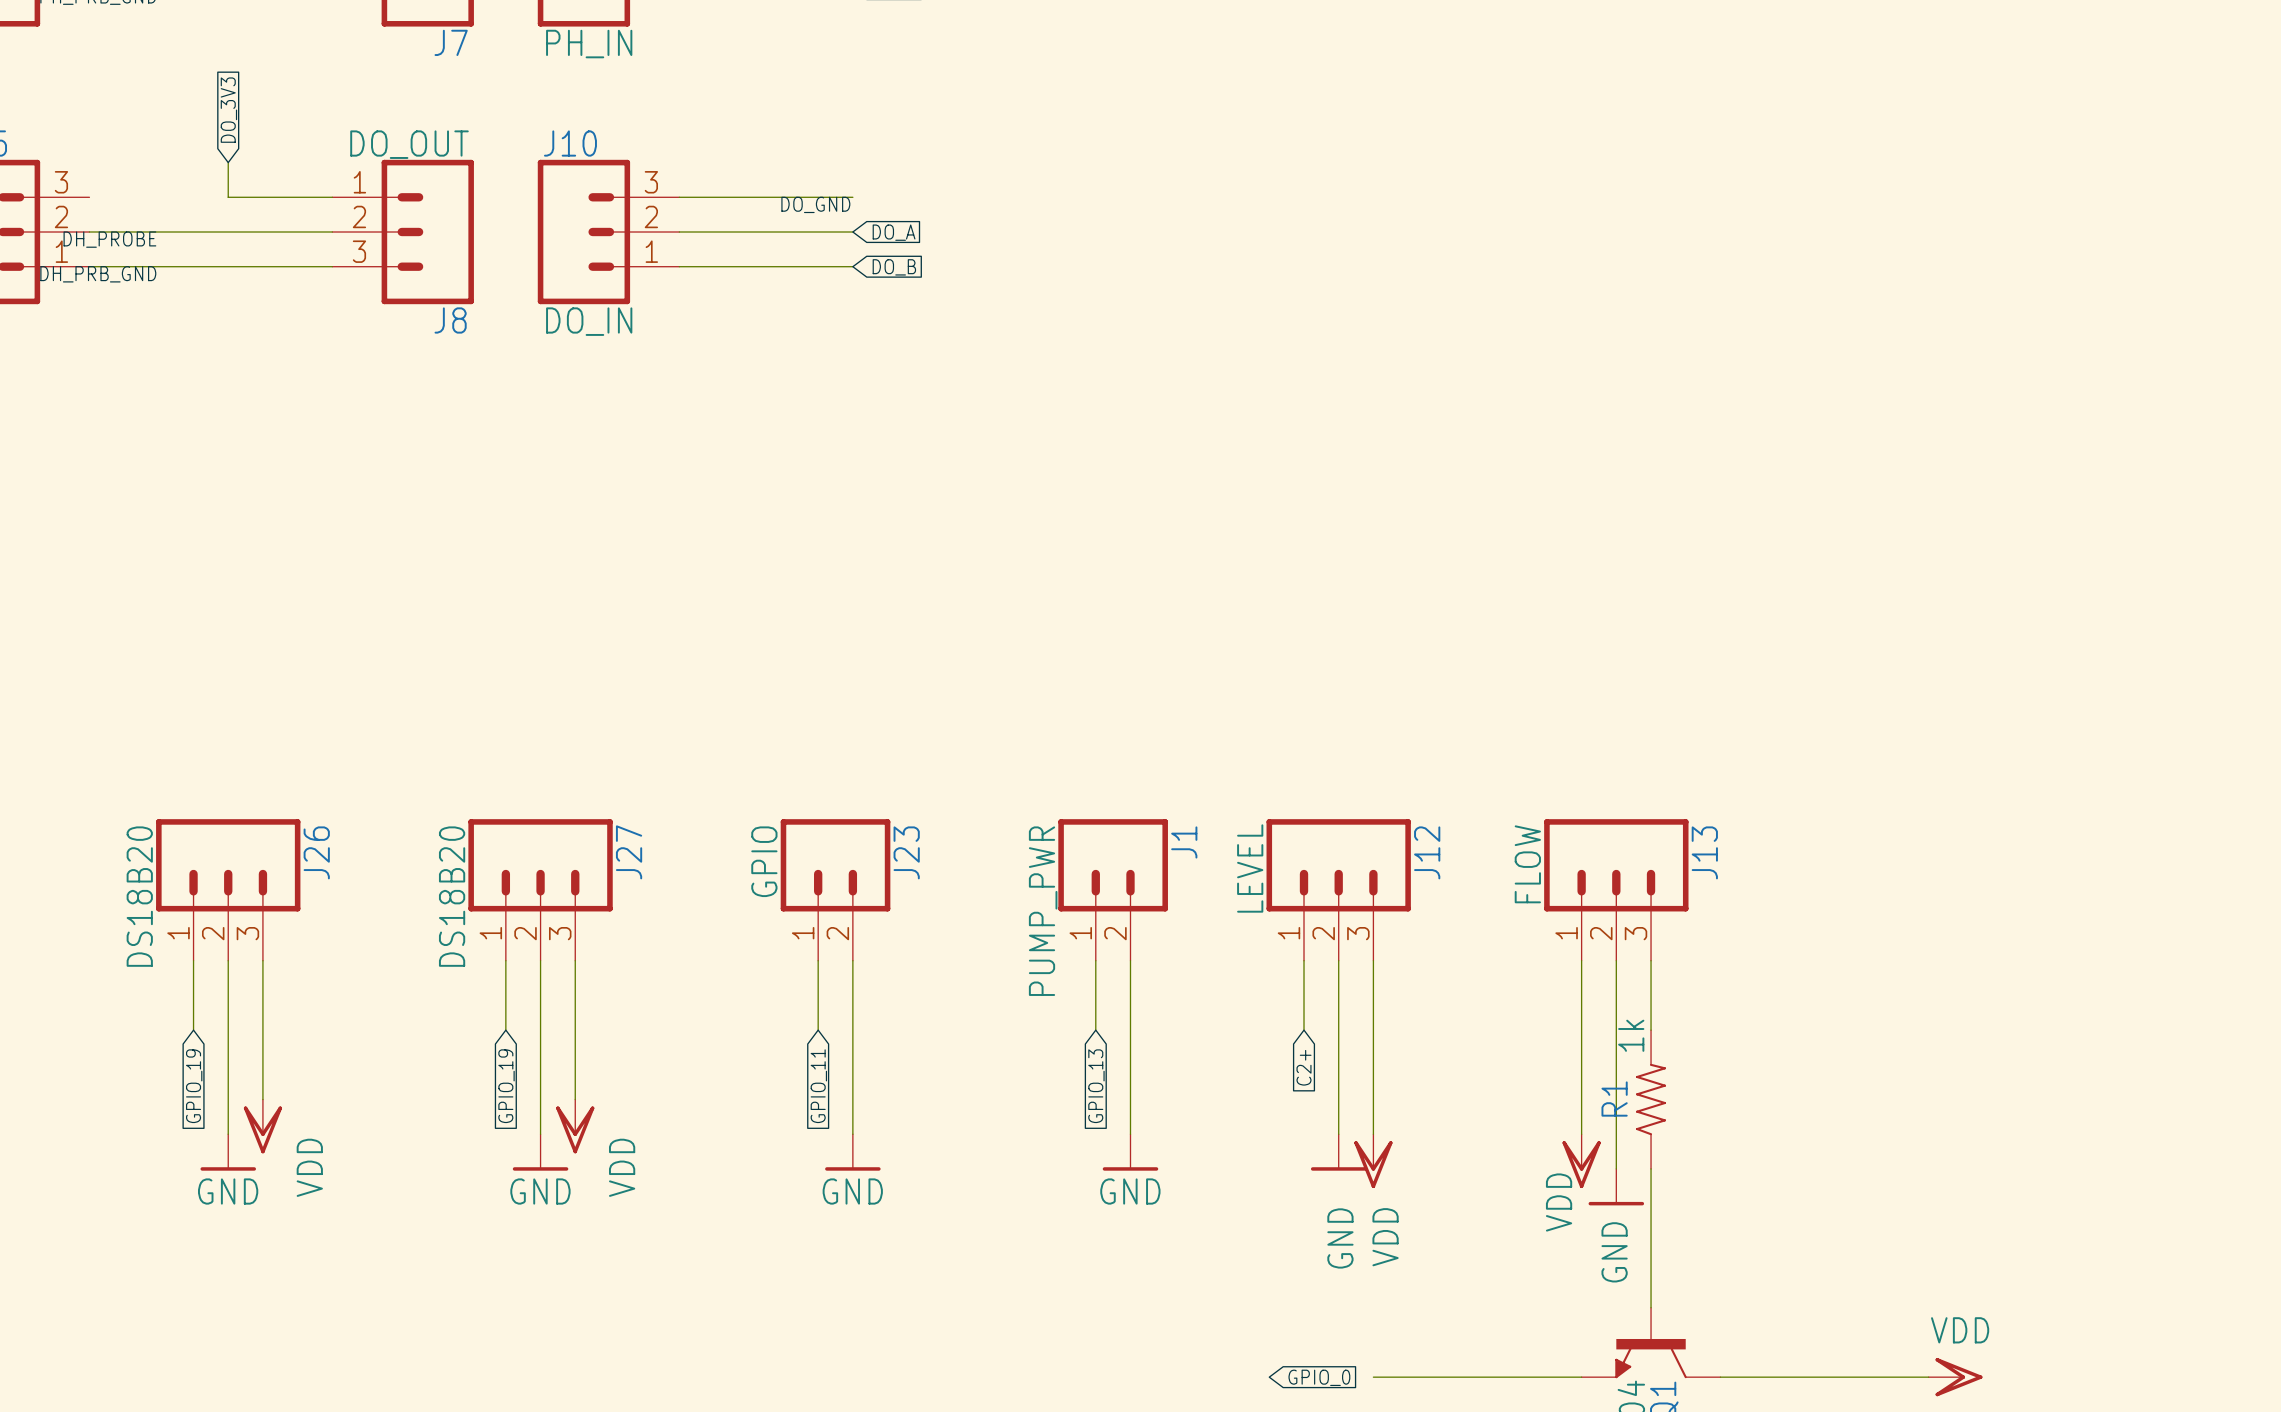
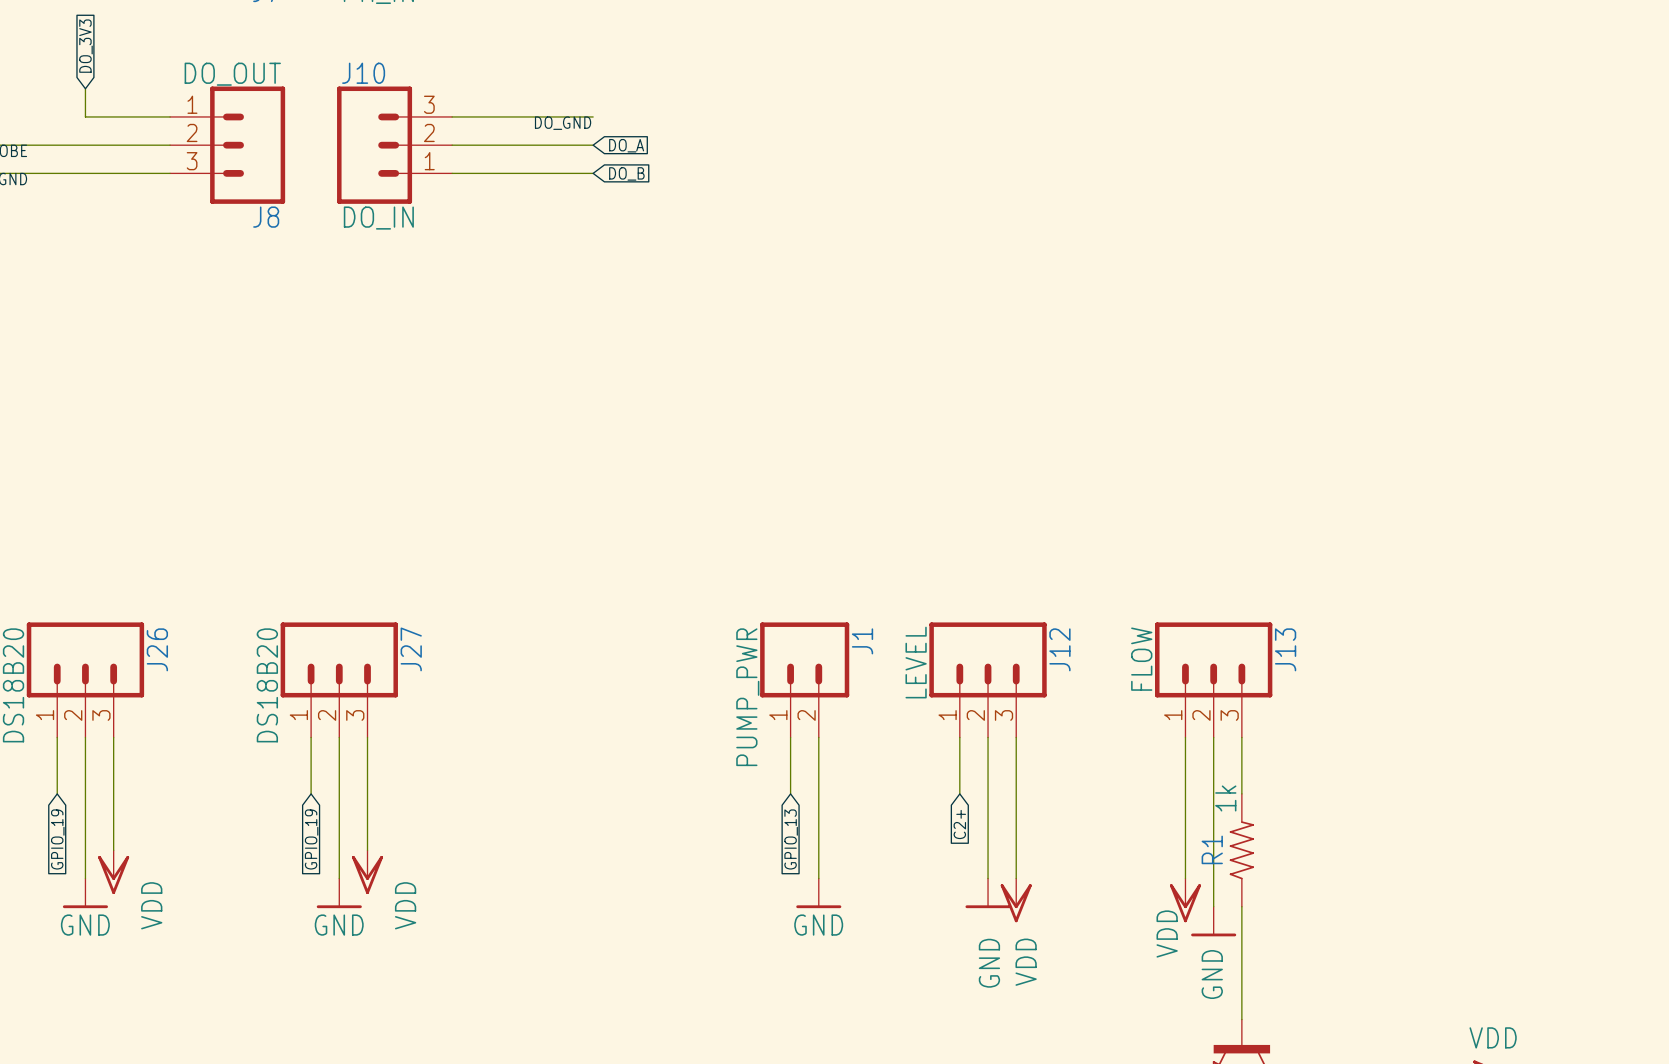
J23: GPIO (835, 889) -> none
wire: (818, 960) (818, 1030) -> none
wire: (852, 960) (852, 1134) -> none
global label: GPIO_11 (818, 1086) -> none
power symbol: GND (852, 1152) -> none

